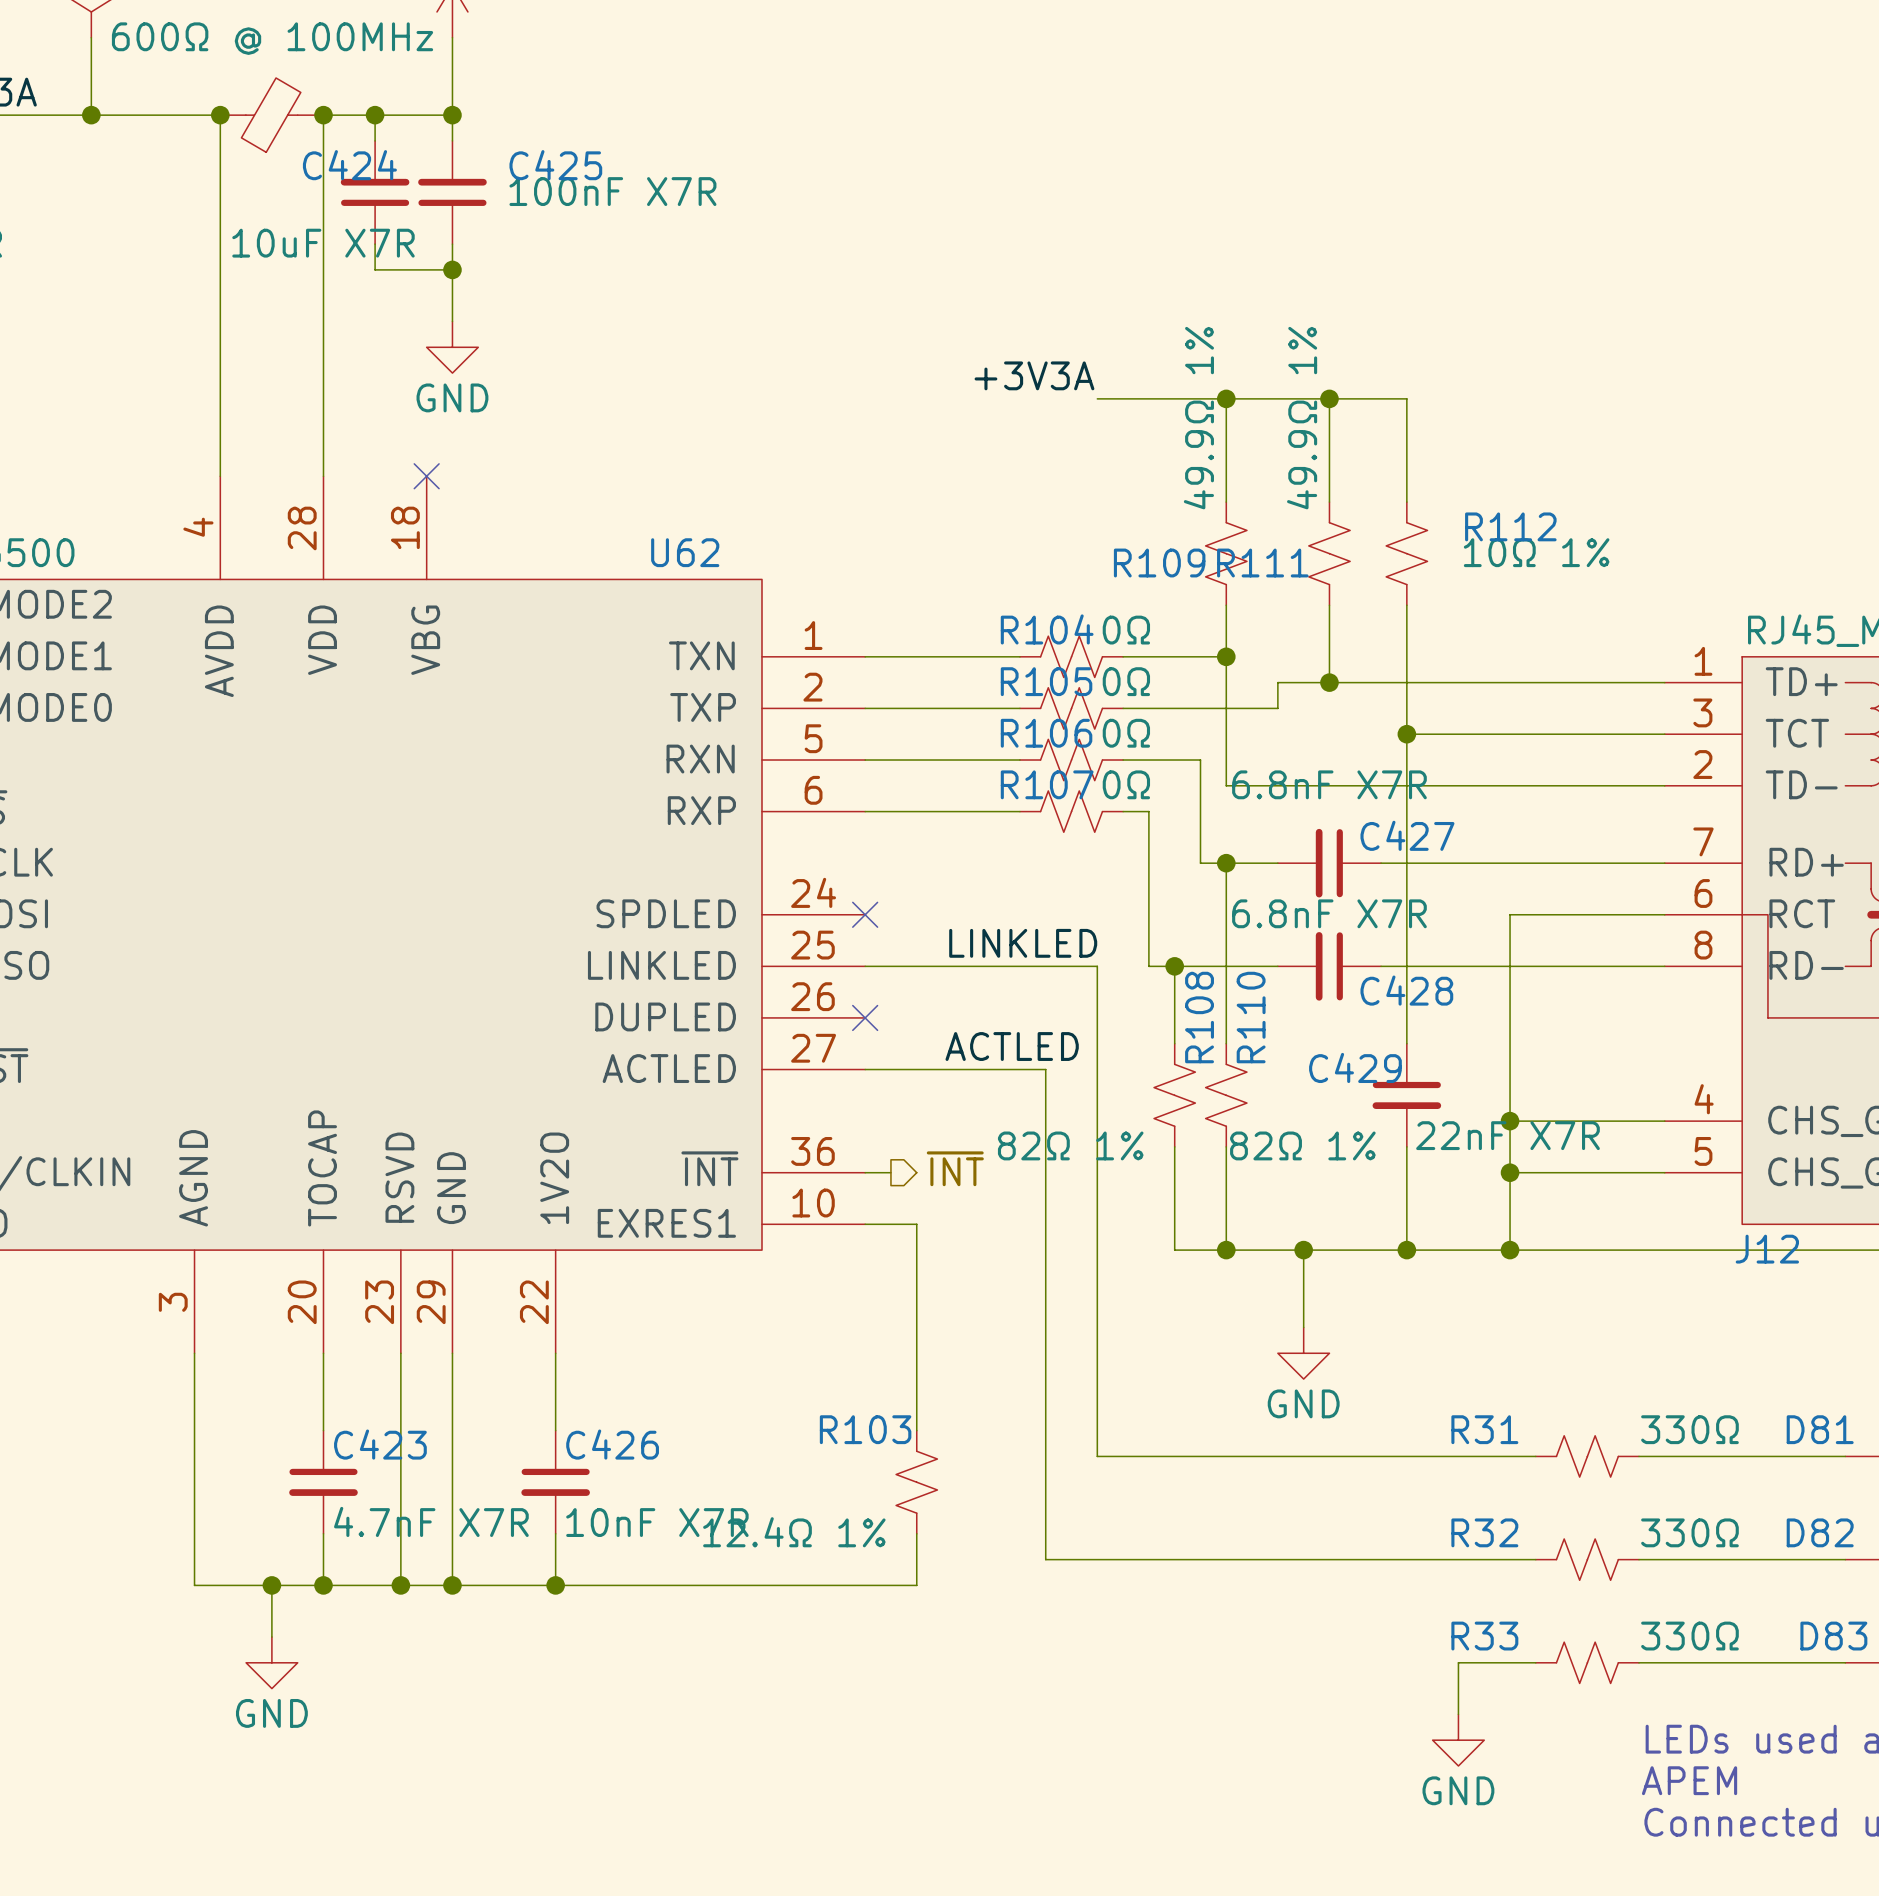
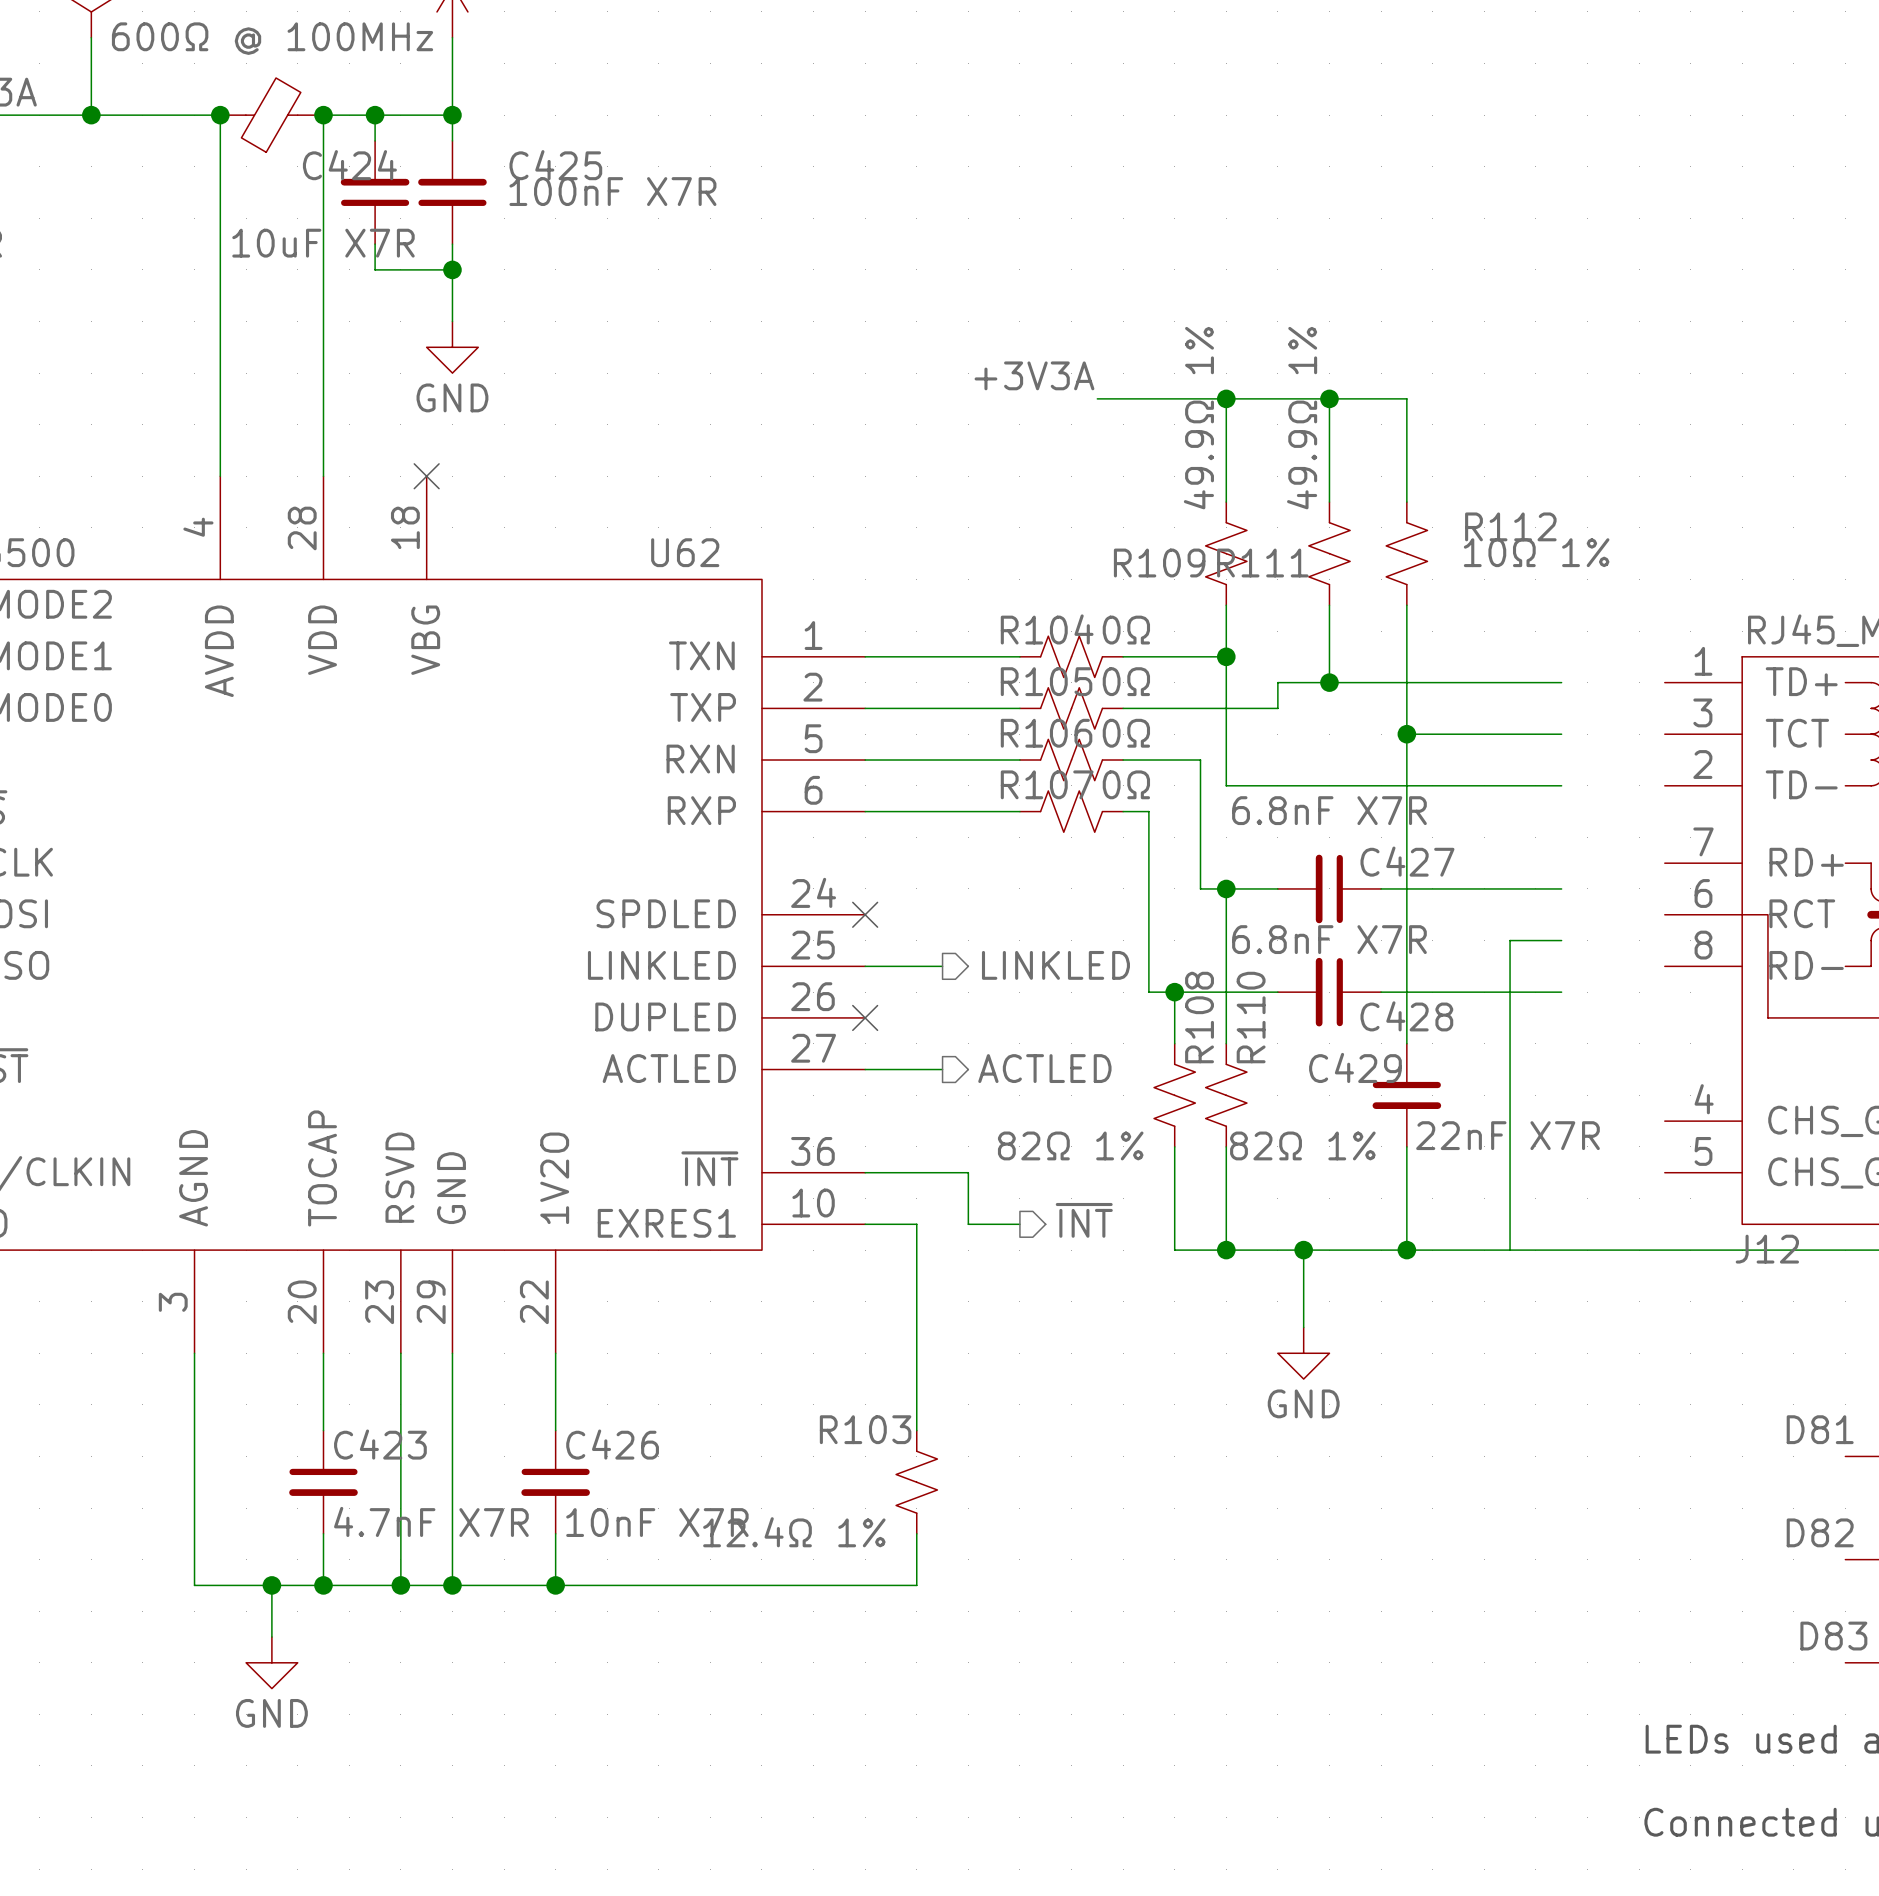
wire: (1561, 682) (1664, 682) -> none
wire: (1561, 734) (1664, 734) -> none
wire: (1561, 785) (1664, 785) -> none
wire: (1200, 863) (1277, 863) -> (1200, 863) (1200, 888) (1277, 888)
wire: (1226, 863) (1226, 888) -> none
junction position: (1226, 863) -> (1226, 888)
C427 position: (1329, 863) -> (1329, 888)
wire: (1381, 863) (1664, 863) -> none
wire: none -> (1381, 888) (1561, 888)
wire: (1664, 914) (1510, 914) (1510, 940) -> (1561, 940) (1510, 940)
label: LINKLED (1023, 943) -> none
hierarchical label: none -> LINKLED (1055, 965)
wire: (942, 966) (1097, 966) (1097, 1456) (1535, 1456) -> none
wire: (1148, 966) (1277, 966) -> (1148, 966) (1148, 992) (1277, 992)
wire: (1174, 966) (1174, 992) -> none
junction position: (1174, 966) -> (1174, 992)
C428 position: (1329, 966) -> (1329, 992)
wire: (1381, 966) (1664, 966) -> none
wire: none -> (1381, 992) (1561, 992)
label: ACTLED (1012, 1046) -> none
hierarchical label: none -> ACTLED (1044, 1068)
wire: (942, 1069) (1045, 1069) (1045, 1559) (1535, 1559) -> none
wire: (1510, 1121) (1664, 1121) -> none
junction: (1510, 1121) -> none
hierarchical label position: ~{INT} (955, 1168) -> ~{INT} (1084, 1220)
wire: none -> (890, 1172) (968, 1172) (968, 1224) (1019, 1224)
wire: (1510, 1172) (1664, 1172) -> none
junction: (1510, 1172) -> none
junction: (1510, 1250) -> none
R31: 330Ω (1587, 1456) -> none
wire: (1639, 1456) (1845, 1456) -> none
R32: 330Ω (1587, 1559) -> none
wire: (1639, 1559) (1845, 1559) -> none
wire: (1535, 1662) (1458, 1662) (1458, 1714) -> none
R33: 330Ω (1587, 1662) -> none
wire: (1639, 1662) (1845, 1662) -> none
power symbol: GND (1458, 1740) -> none
text: APEM (1689, 1780) -> none

